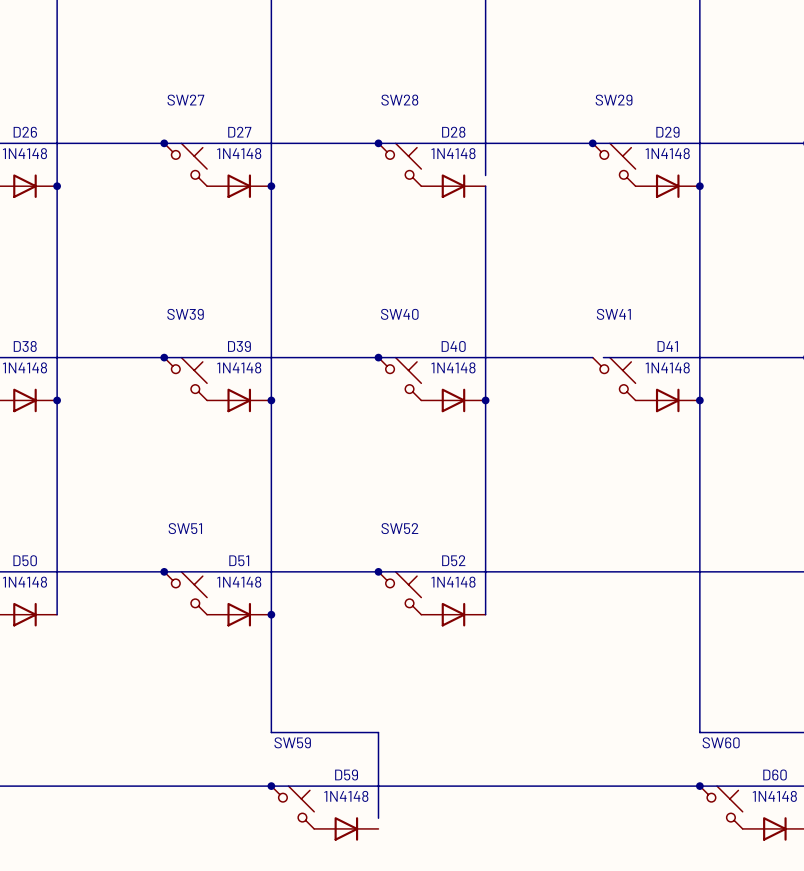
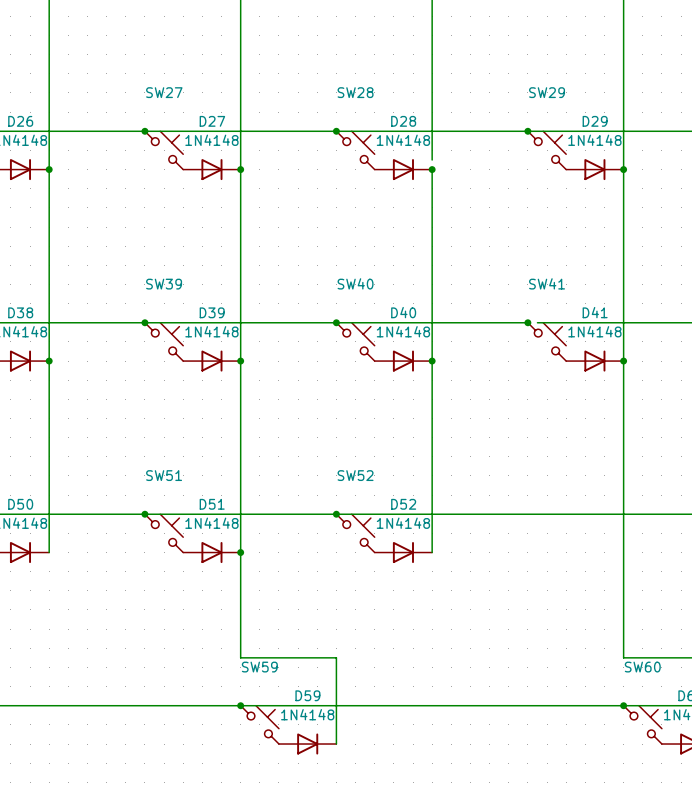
junction: none -> (432, 169)
junction: none -> (527, 322)
wire: none -> (336, 734) (336, 744)

